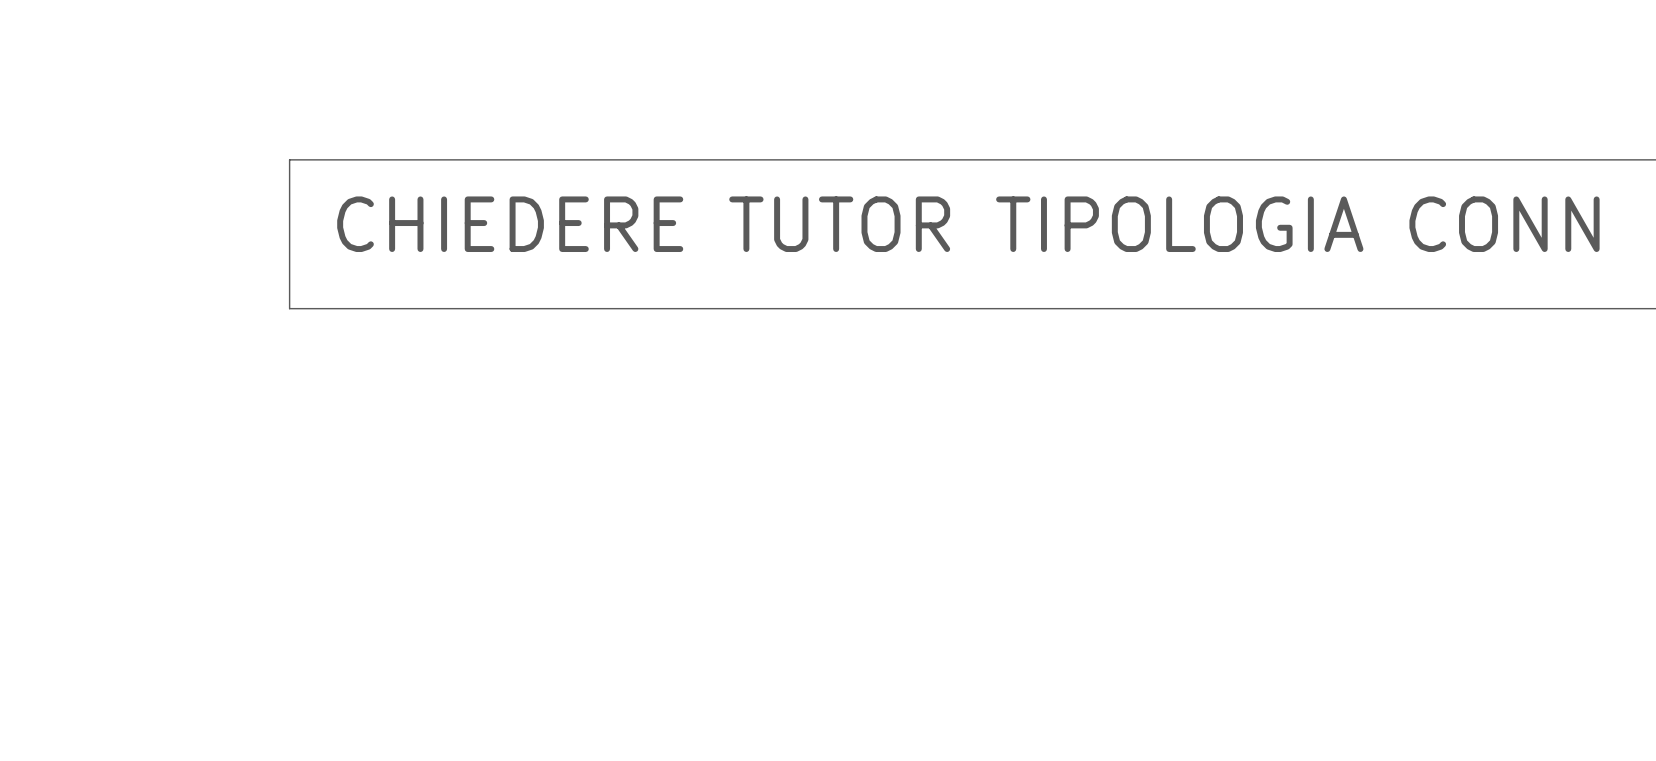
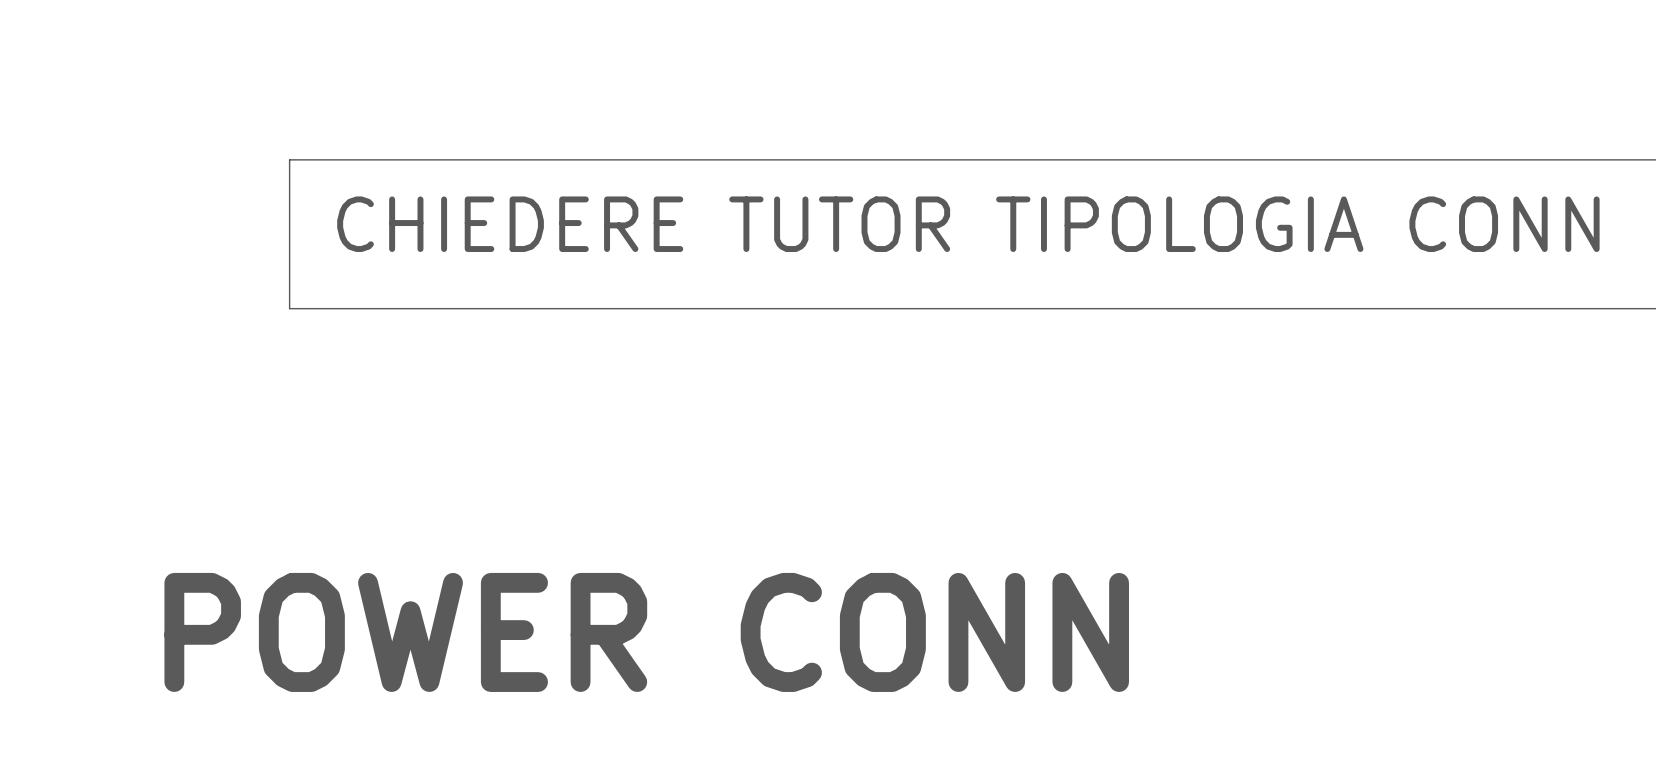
text: none -> POWER CONN (646, 632)

